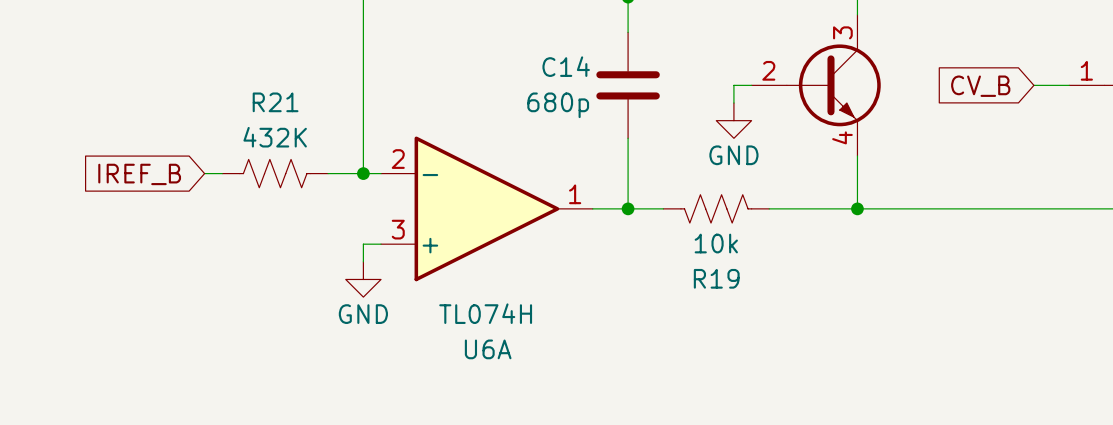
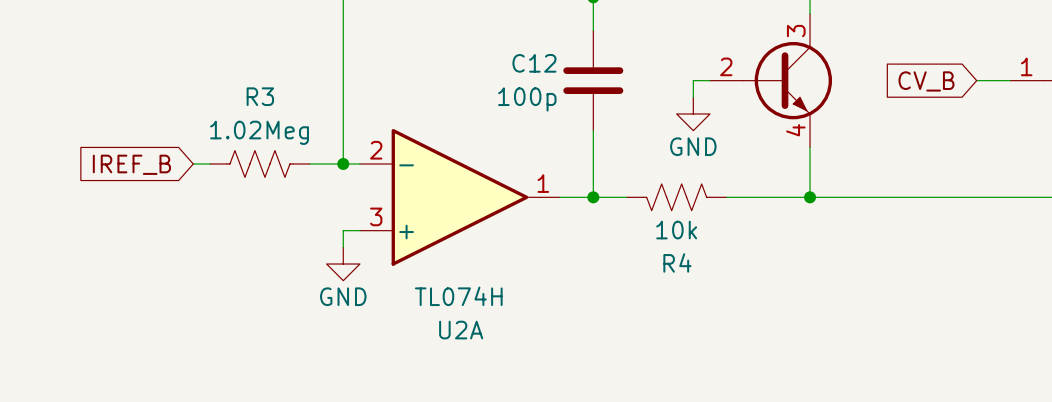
C14 name: C14 (566, 66) -> C12 (534, 63)
R21 name: R21 (275, 102) -> R3 (260, 96)
C14 value: 680p (558, 105) -> 100p (527, 99)
R21 value: 432K (275, 137) -> 1.02Meg (259, 132)
R19 name: R19 (716, 278) -> R4 (677, 262)
U6A name: U6A (488, 349) -> U2A (461, 330)

